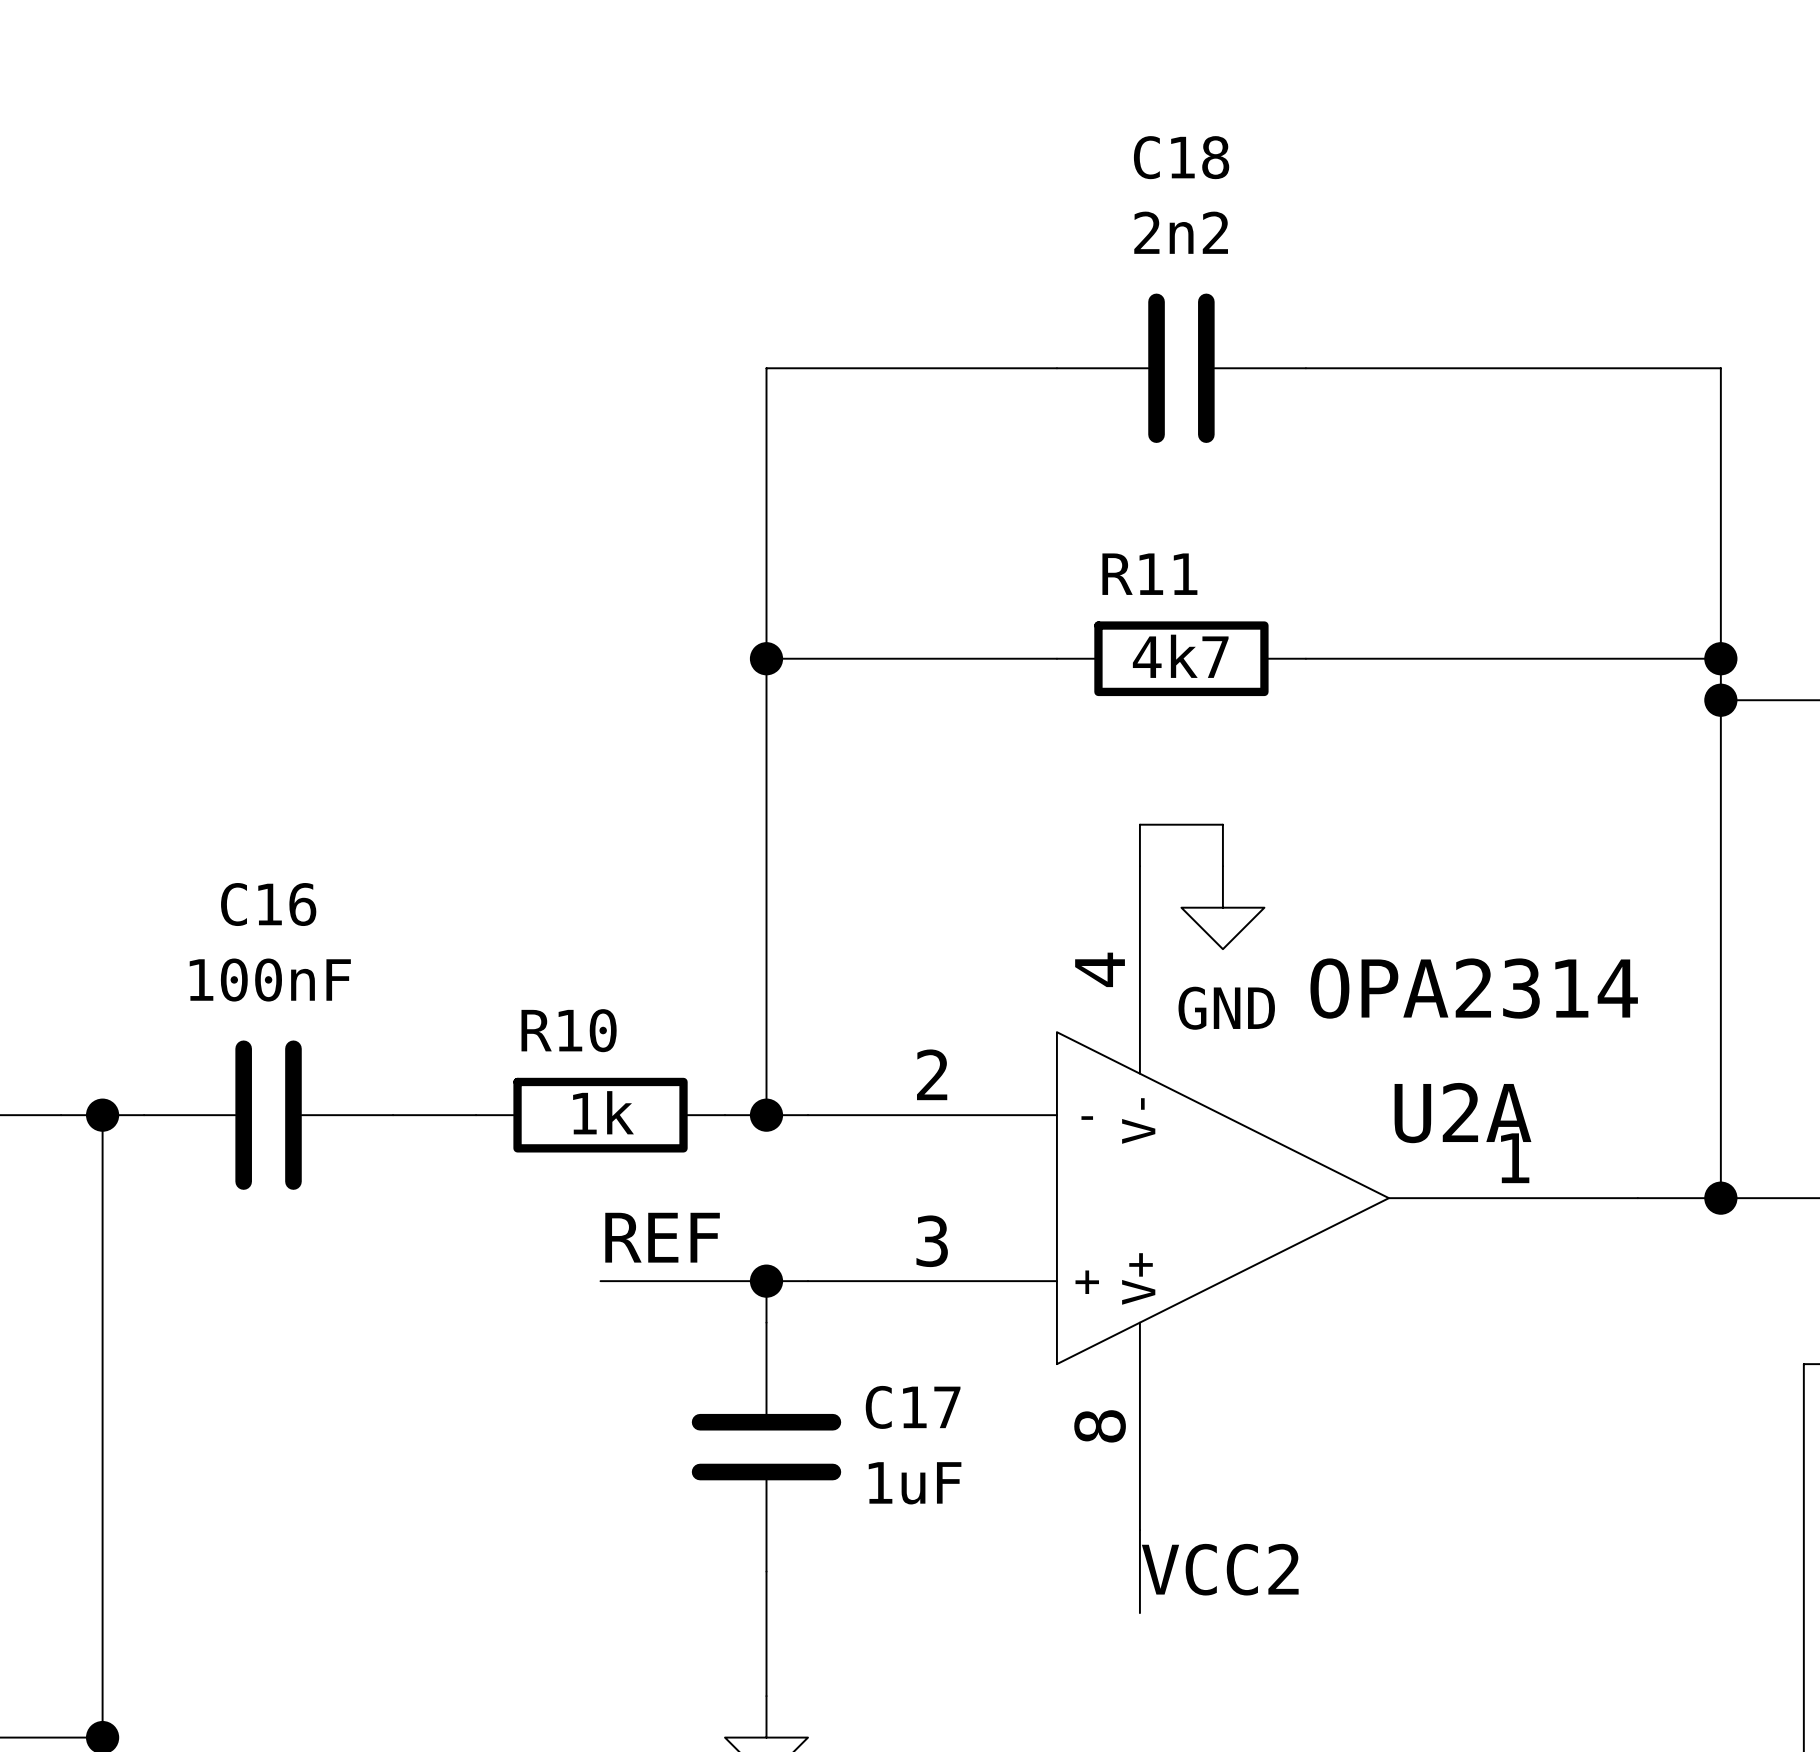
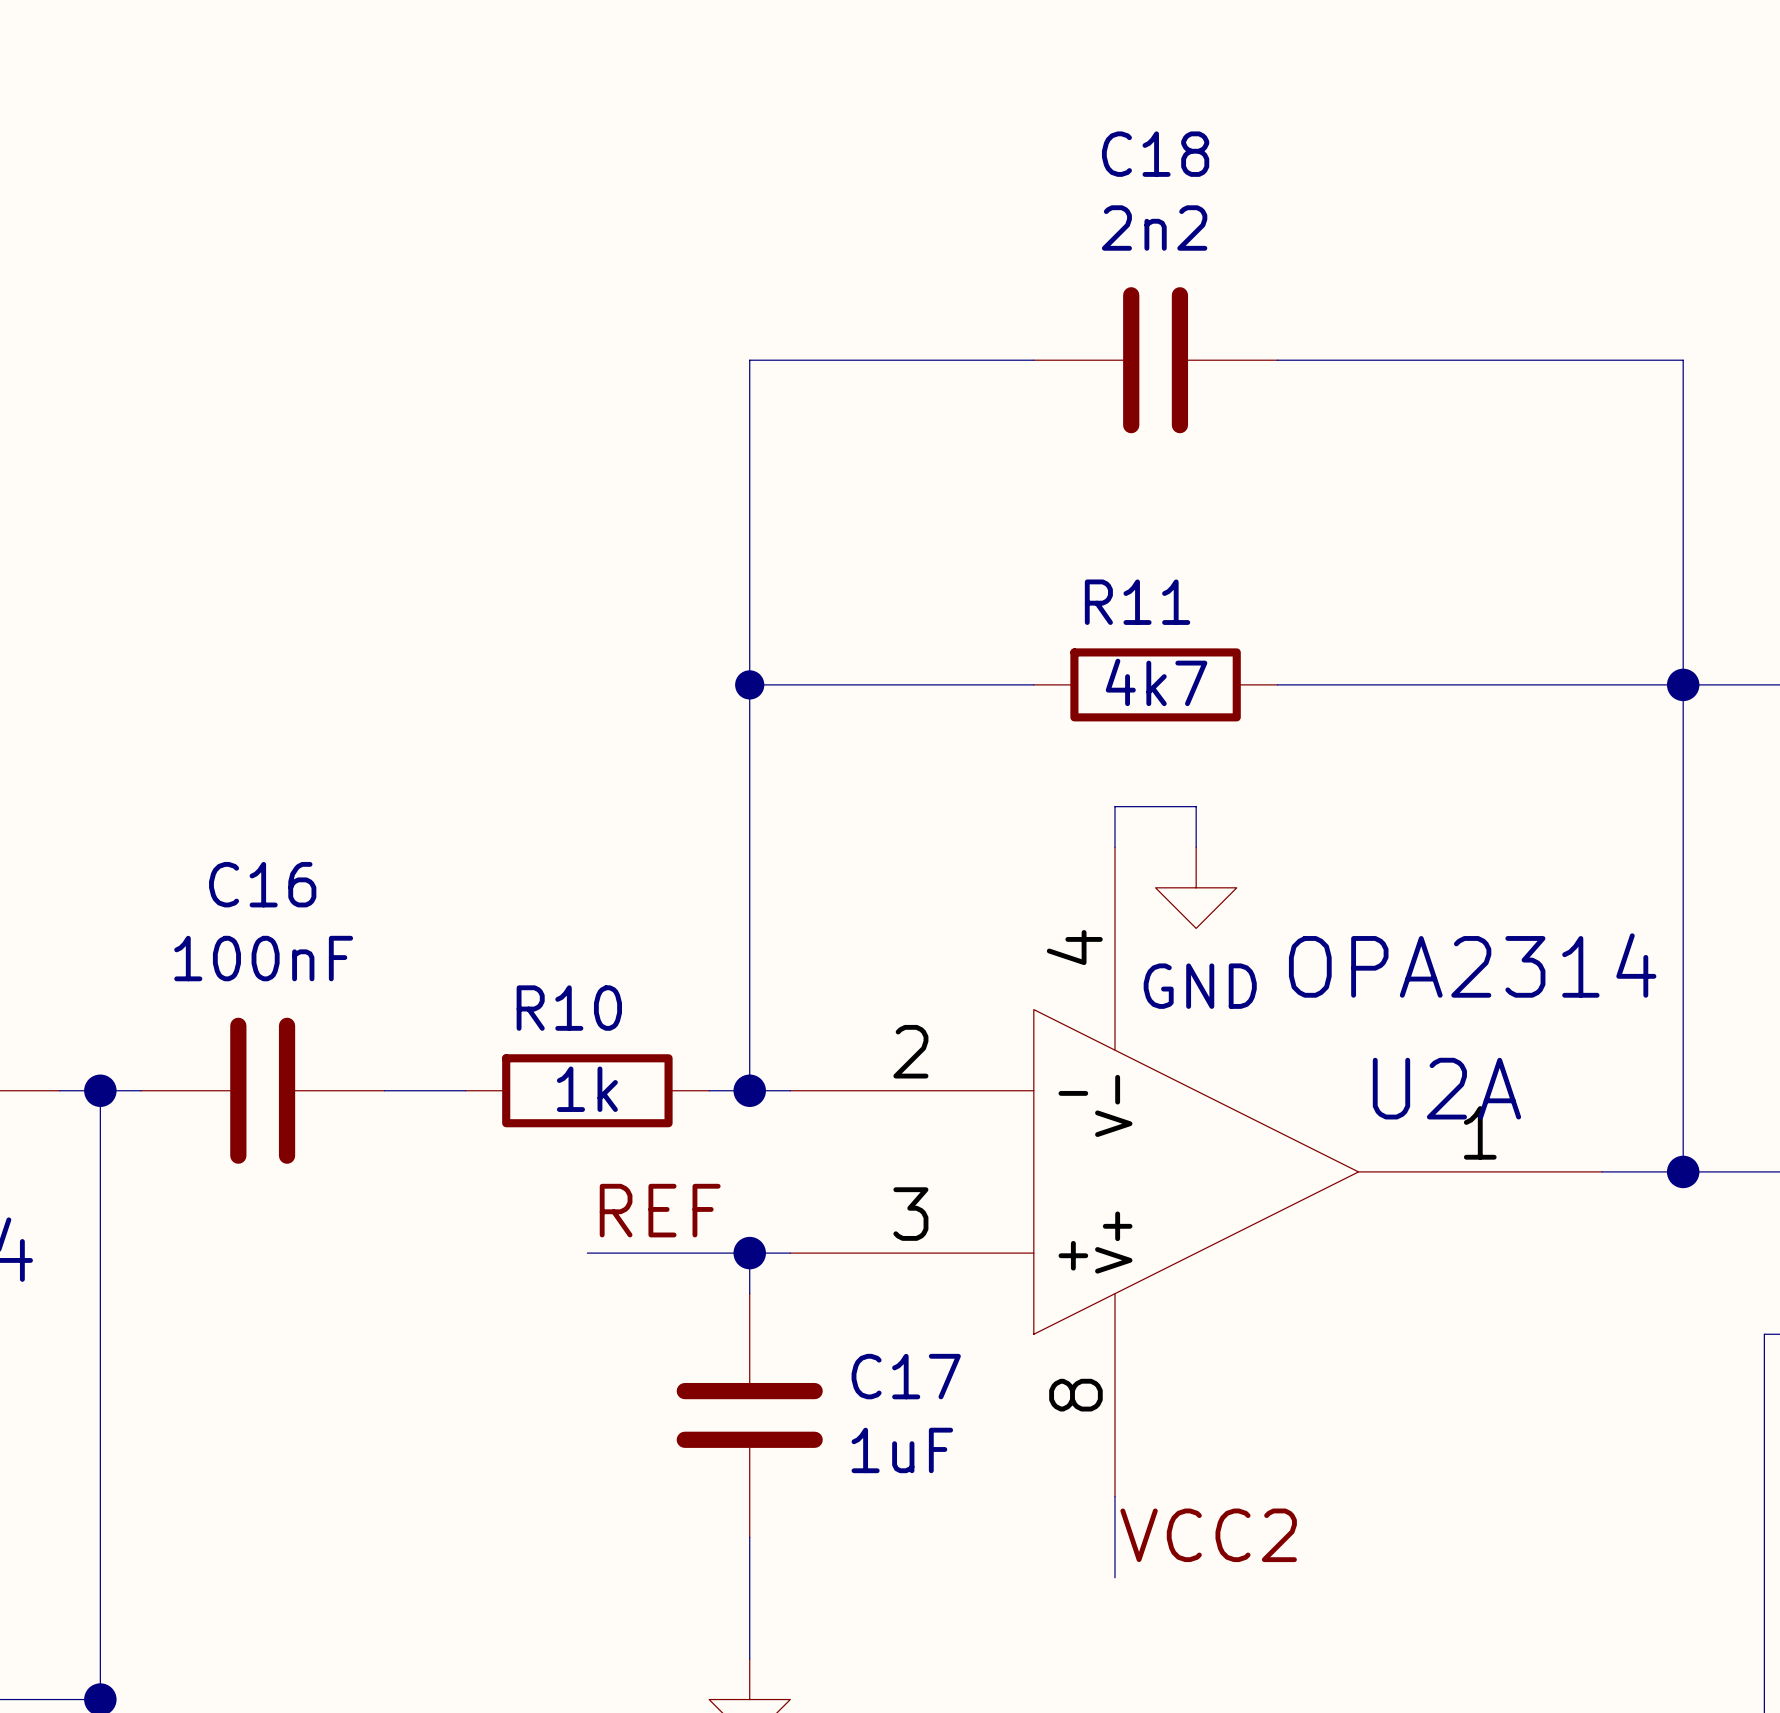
wire: (766, 658) (1056, 658) -> (749, 684) (1033, 684)
junction: (766, 658) -> none
R11 position: (1181, 658) -> (1155, 684)
wire: (1305, 658) (1720, 658) -> (1277, 684) (1683, 684)
junction: (1720, 658) -> none
junction: none -> (749, 684)

